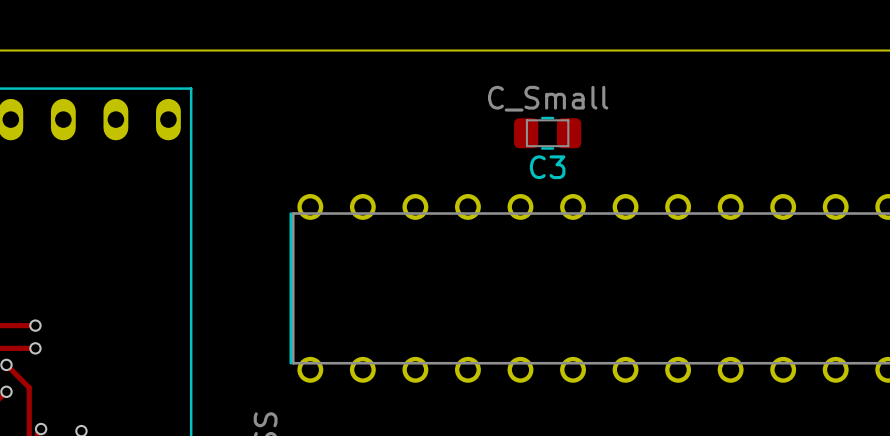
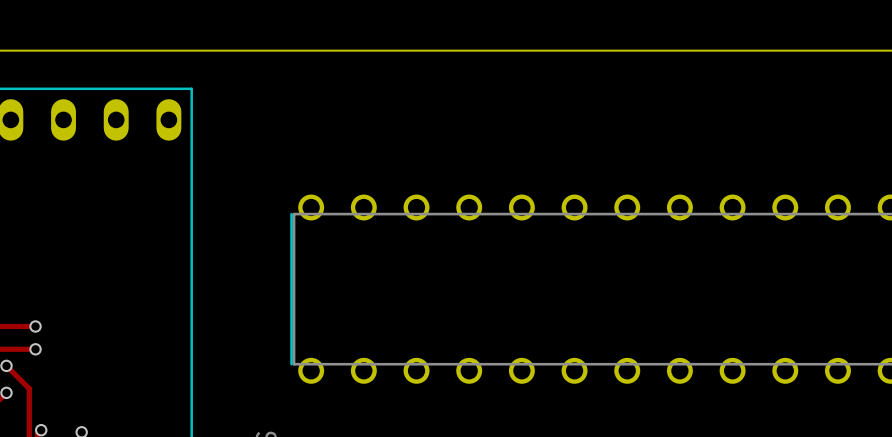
C3: C_Small (547, 133) -> none

